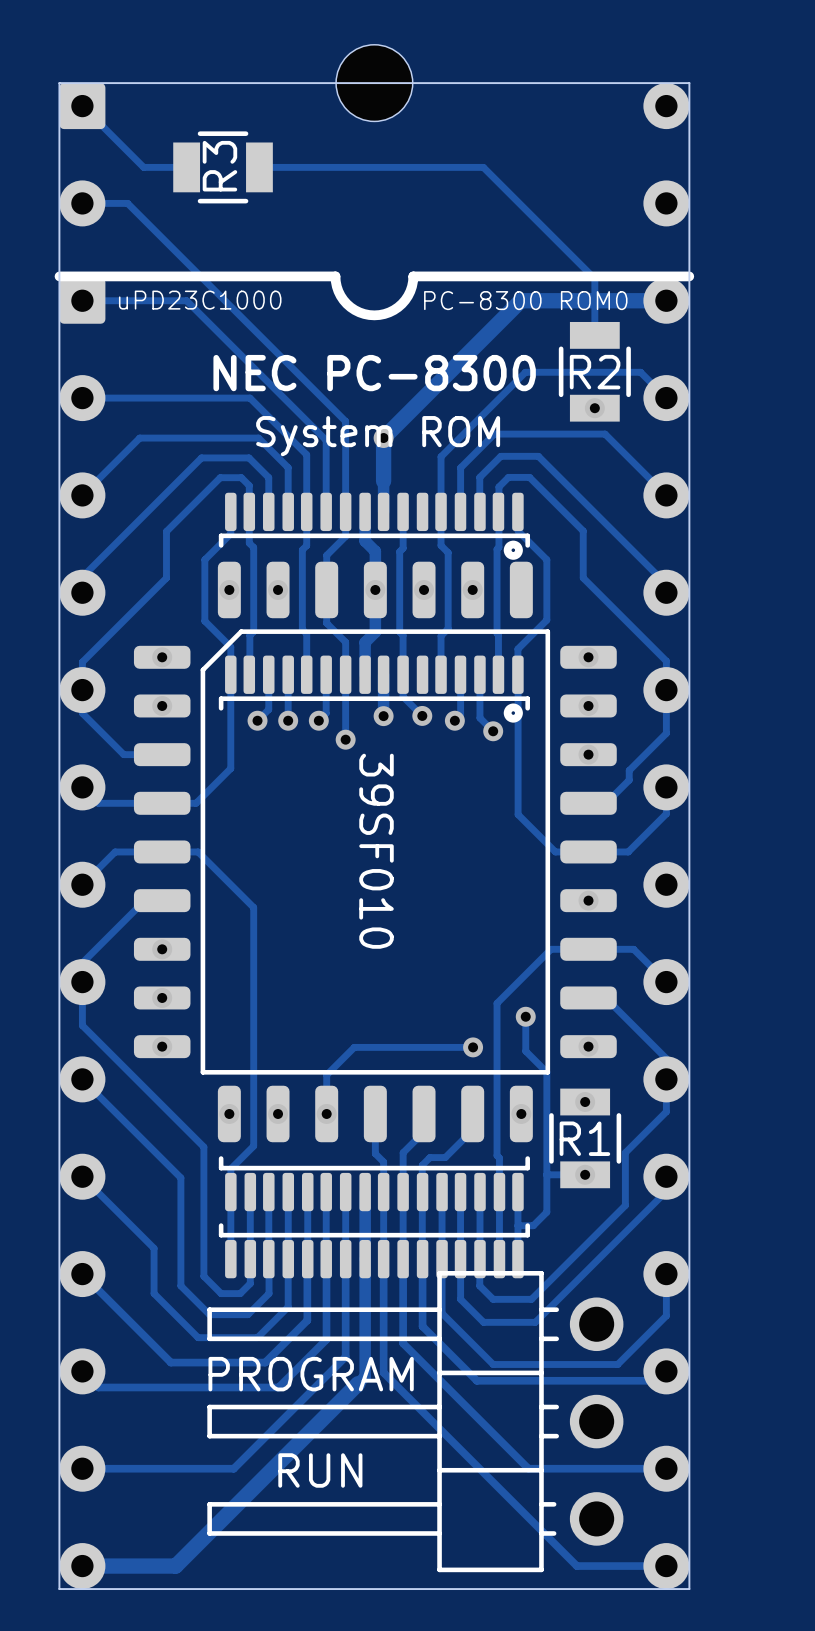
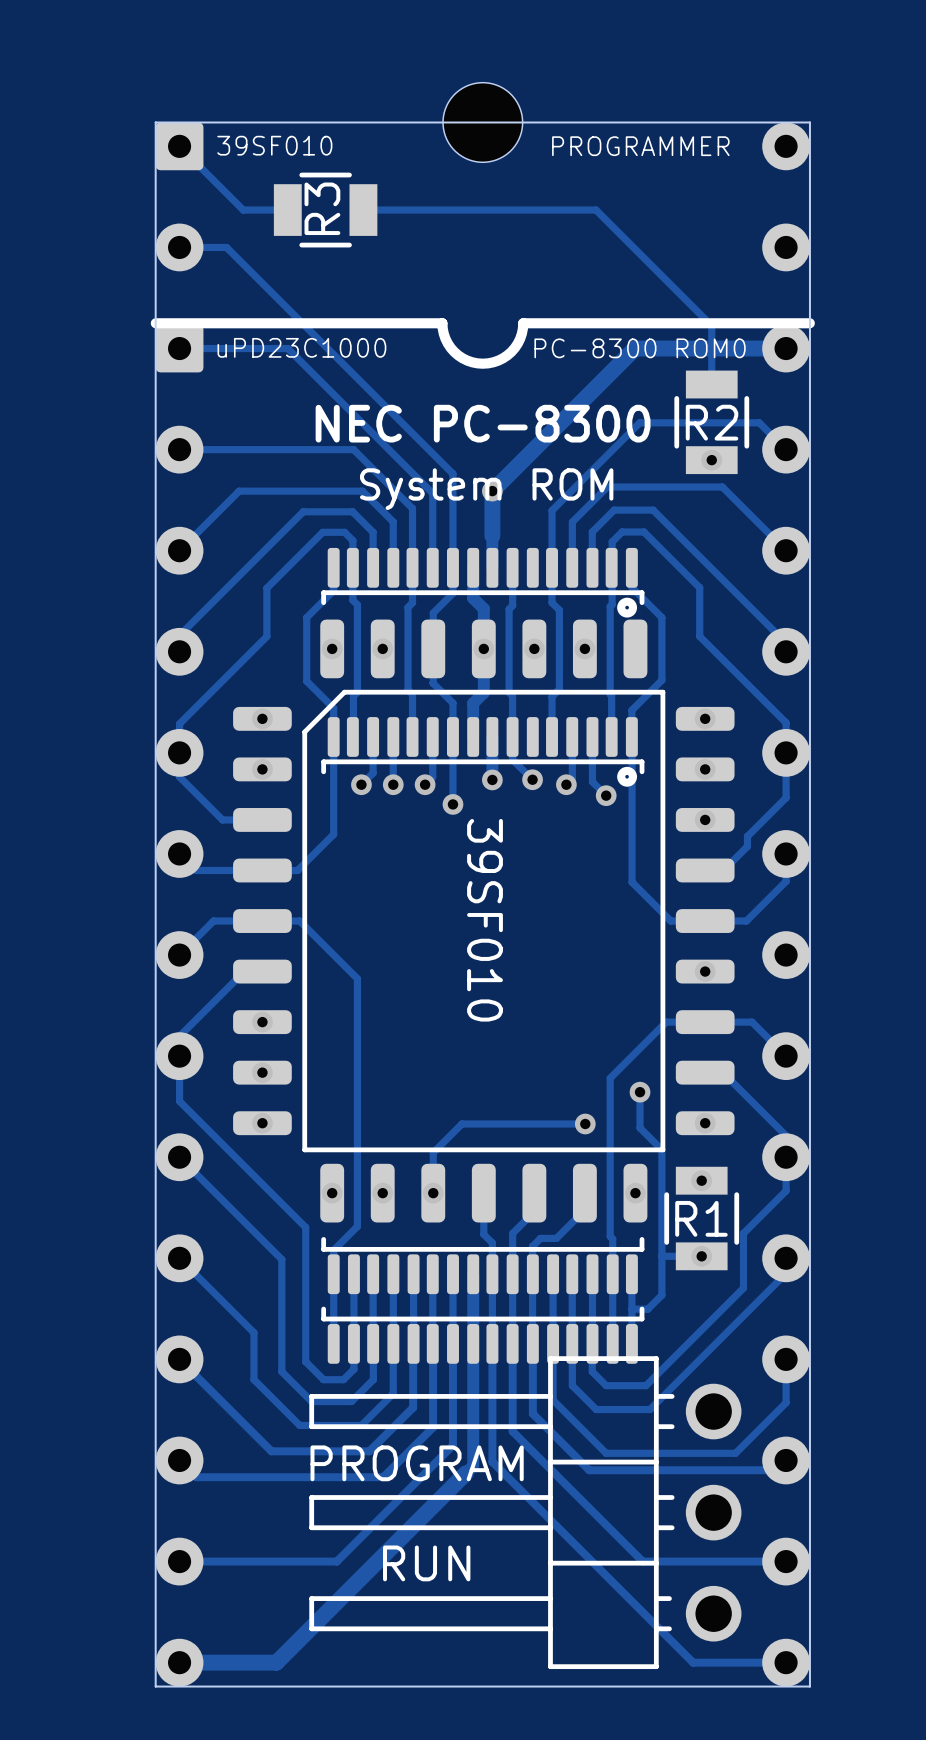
text: none -> 39SF010 (274, 145)
text: none -> PROGRAMMER (640, 146)

